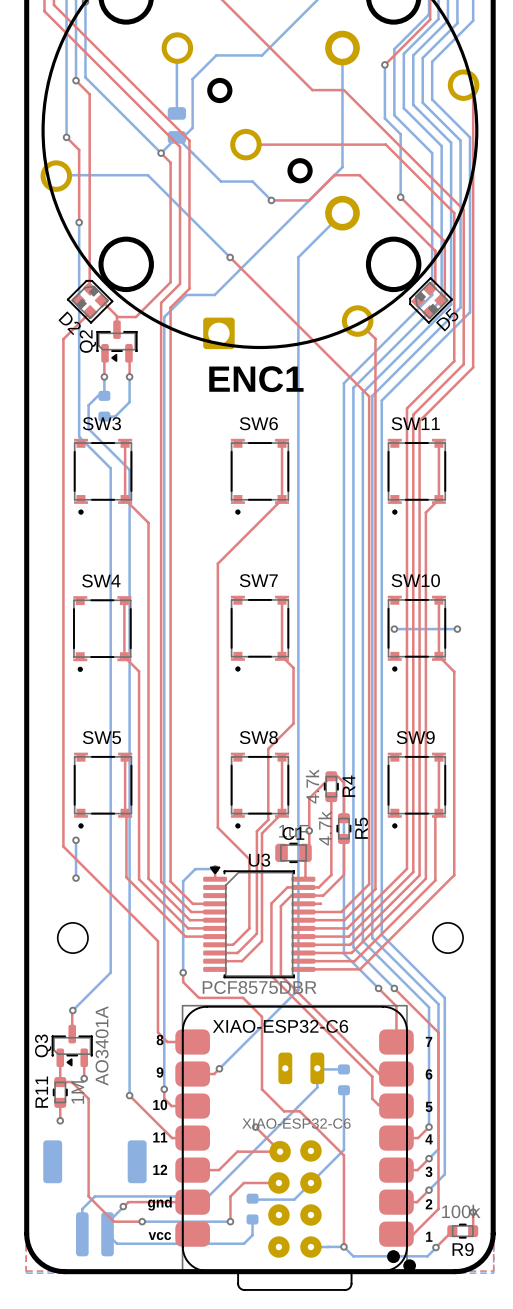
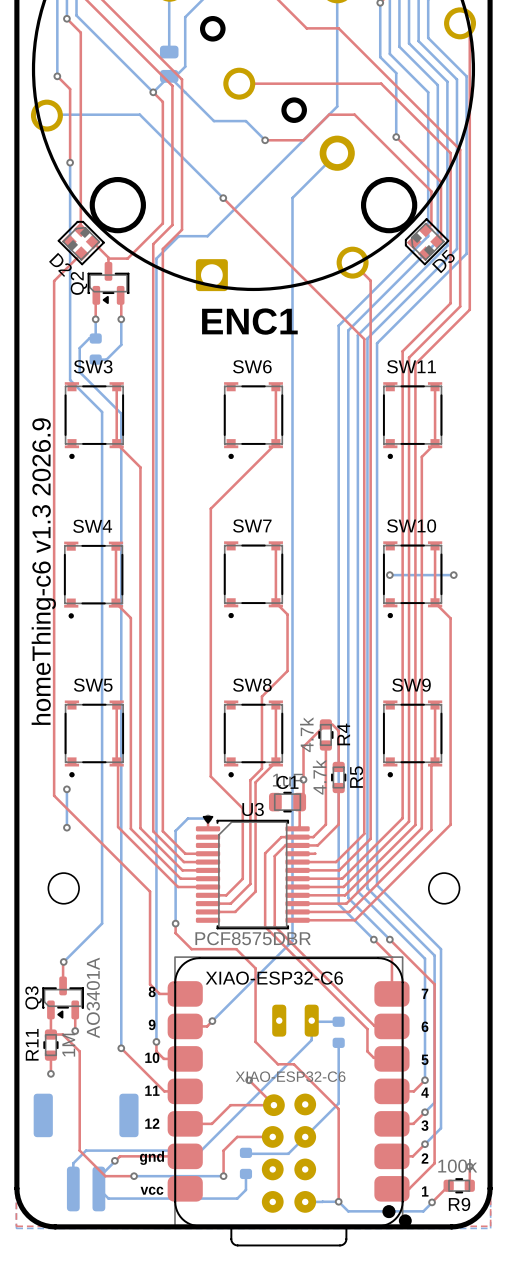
text: none -> homeThing-c6 v1.3 2026.9 (43, 571)

